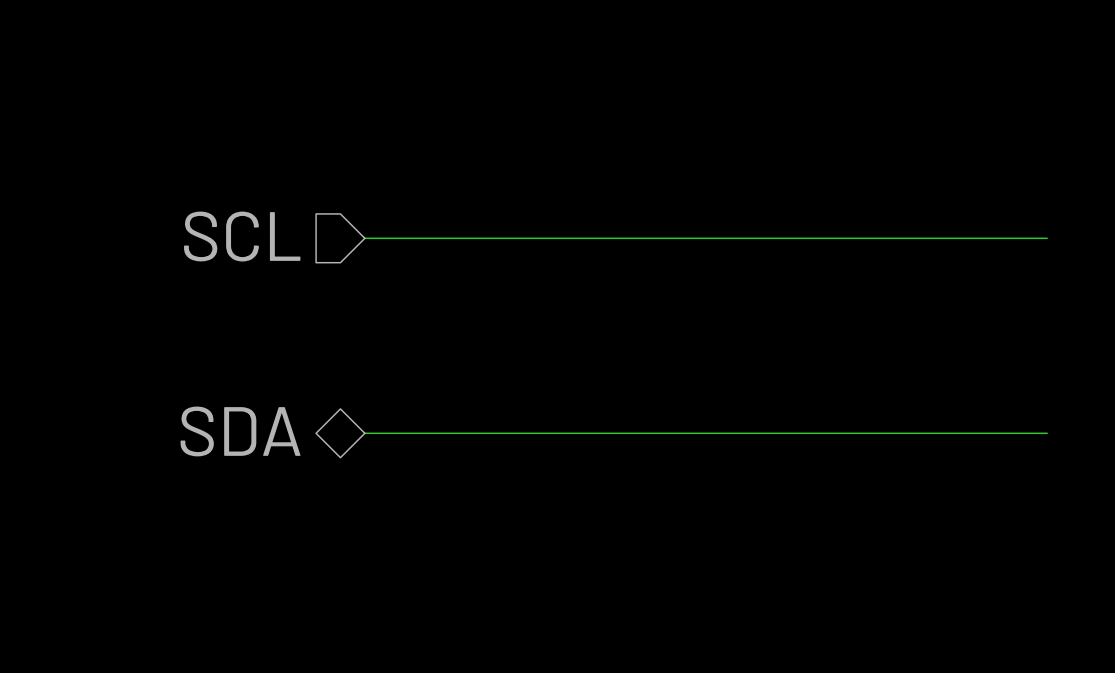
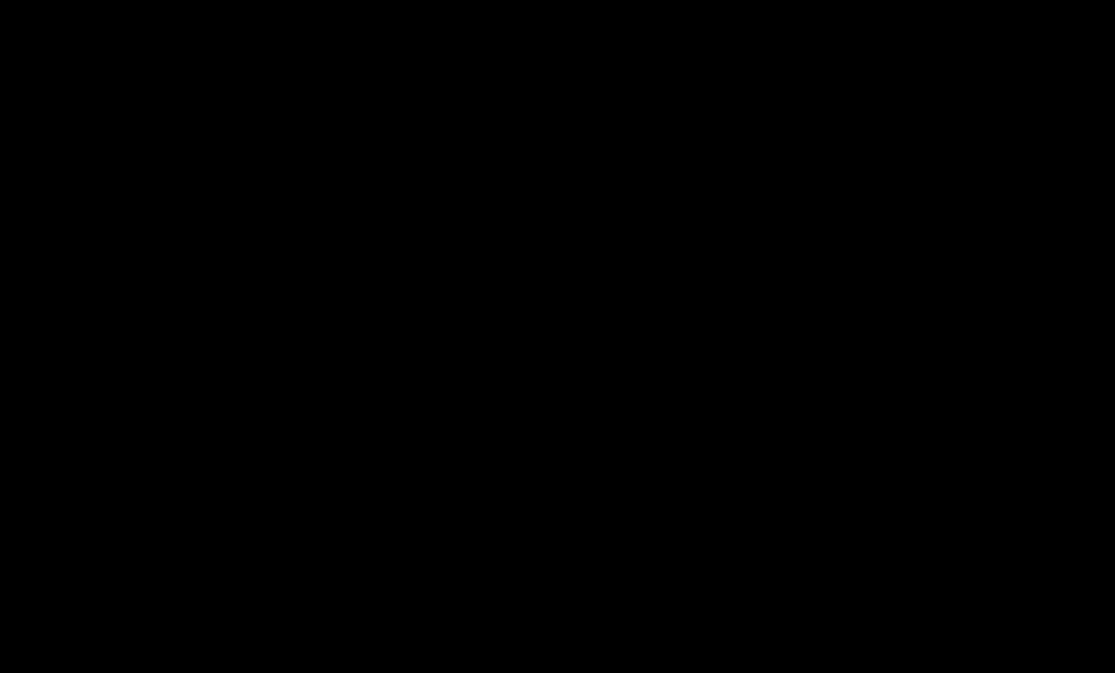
hierarchical label: SCL (242, 236) -> none
wire: (364, 238) (1047, 238) -> none
hierarchical label: SDA (240, 431) -> none
wire: (364, 433) (1047, 433) -> none

